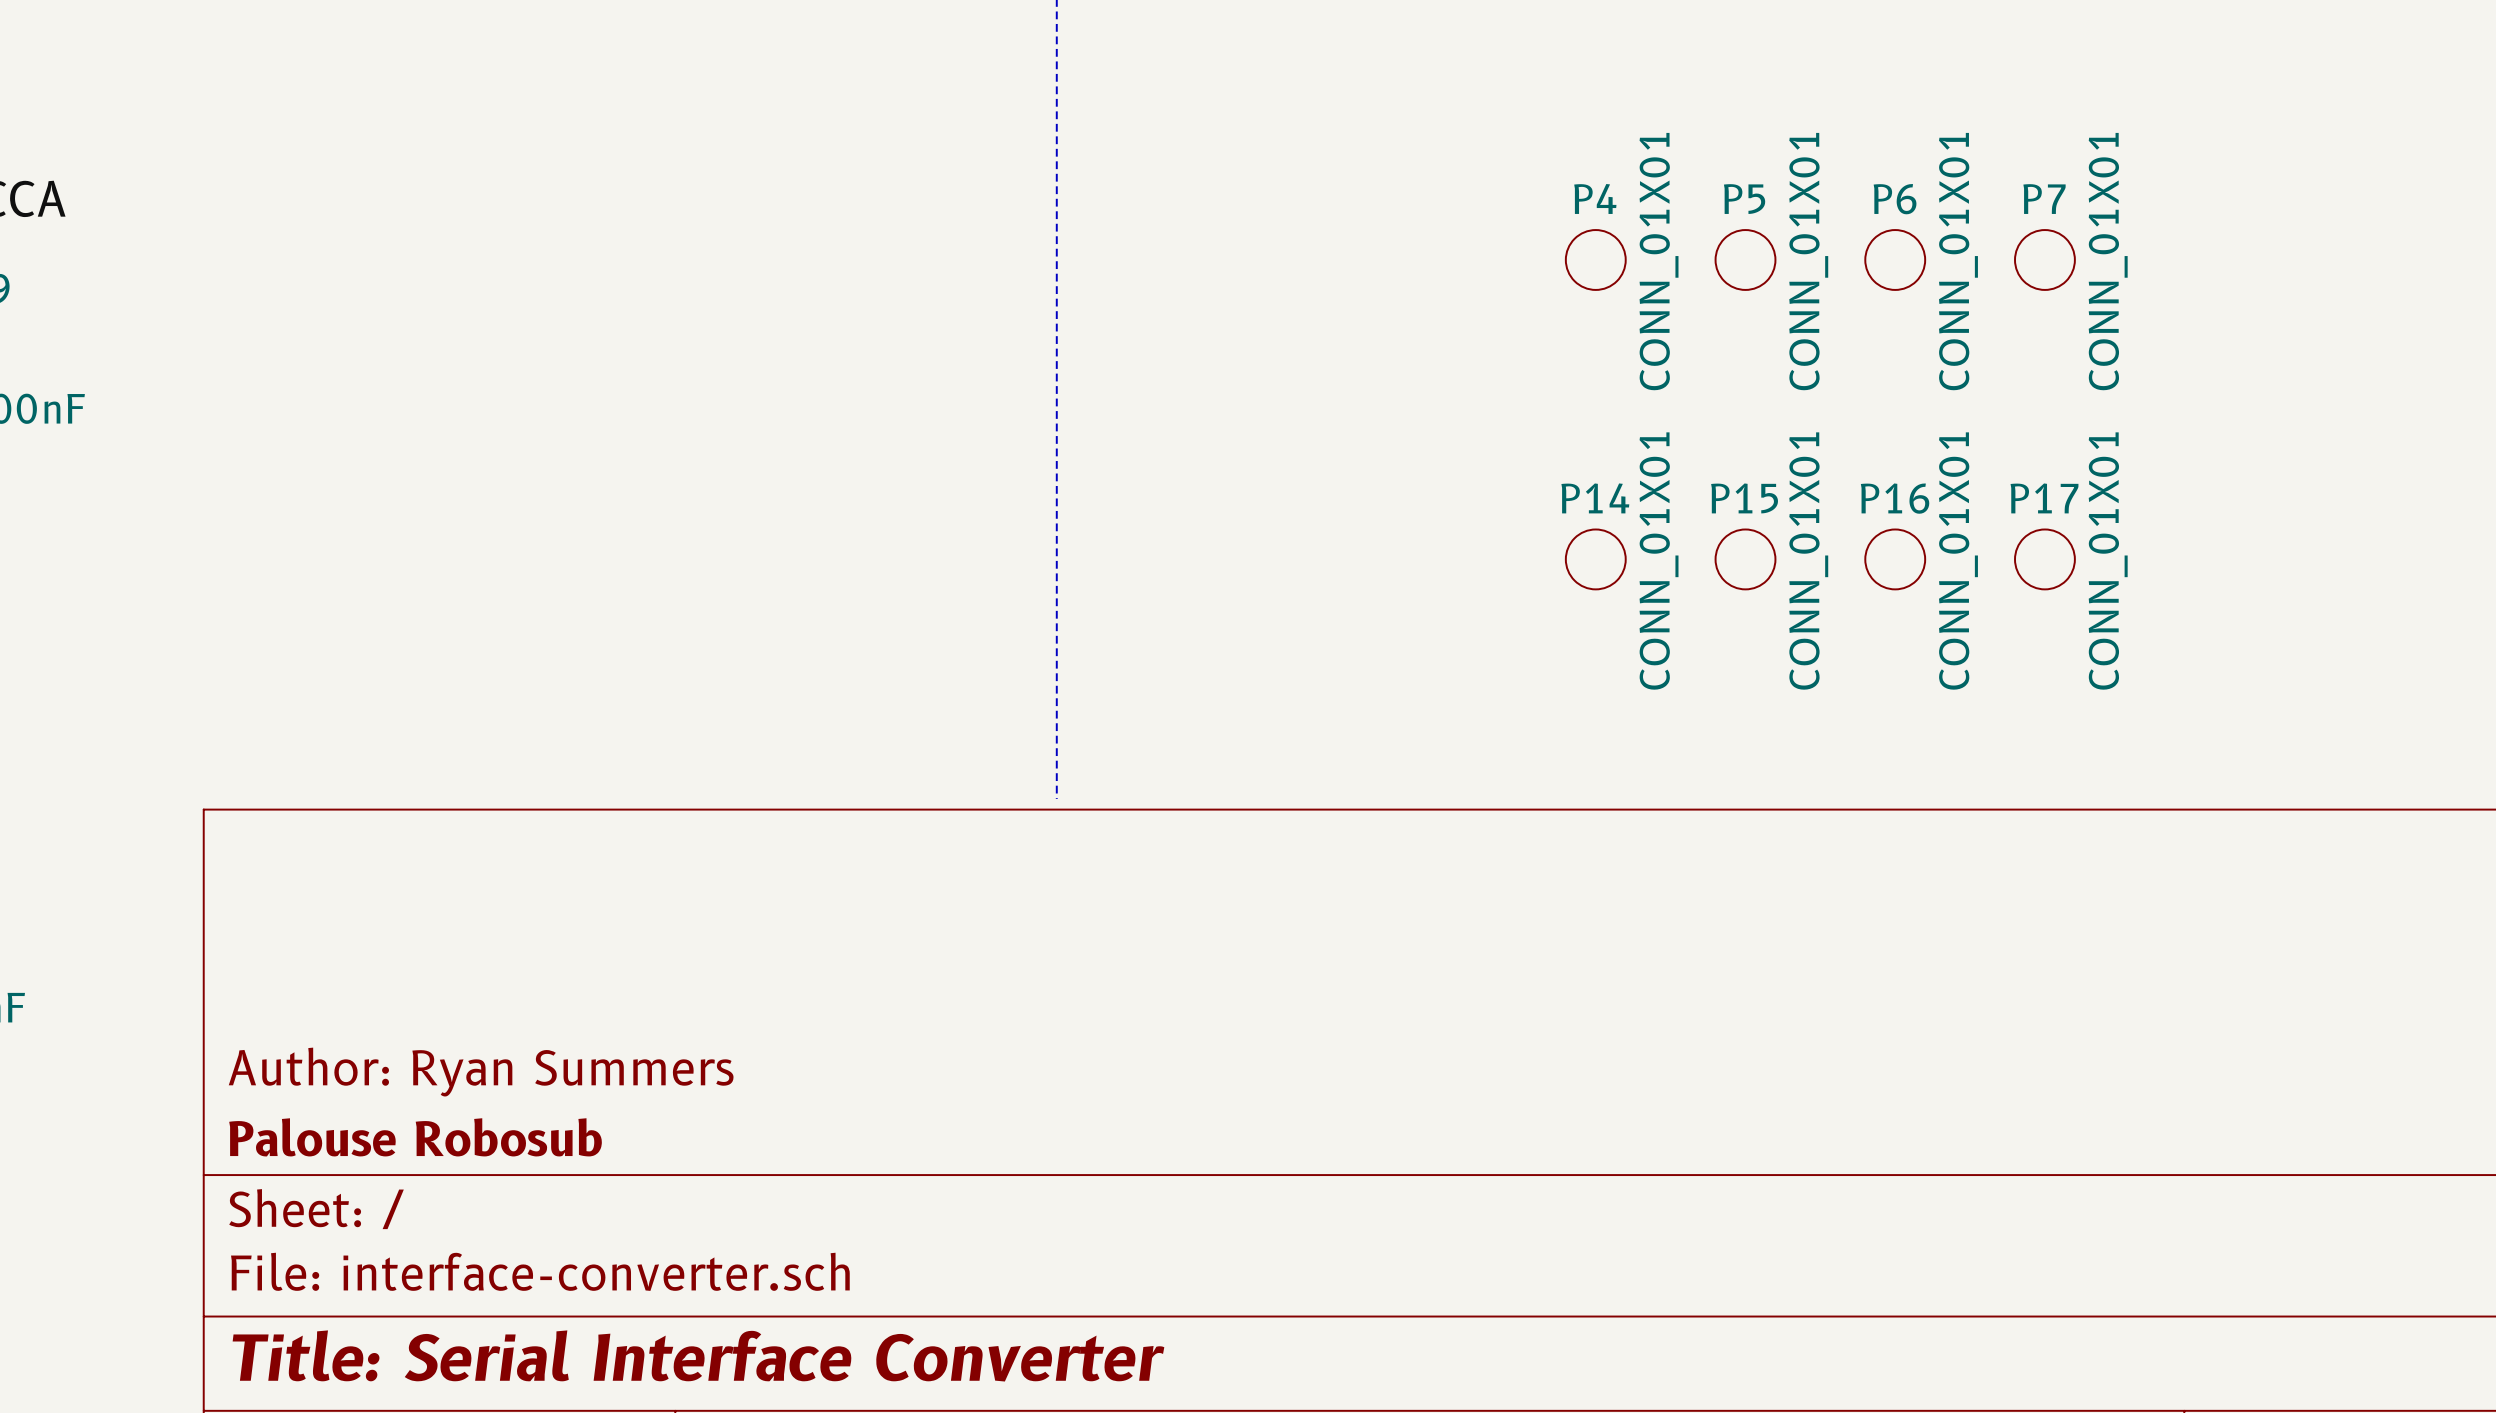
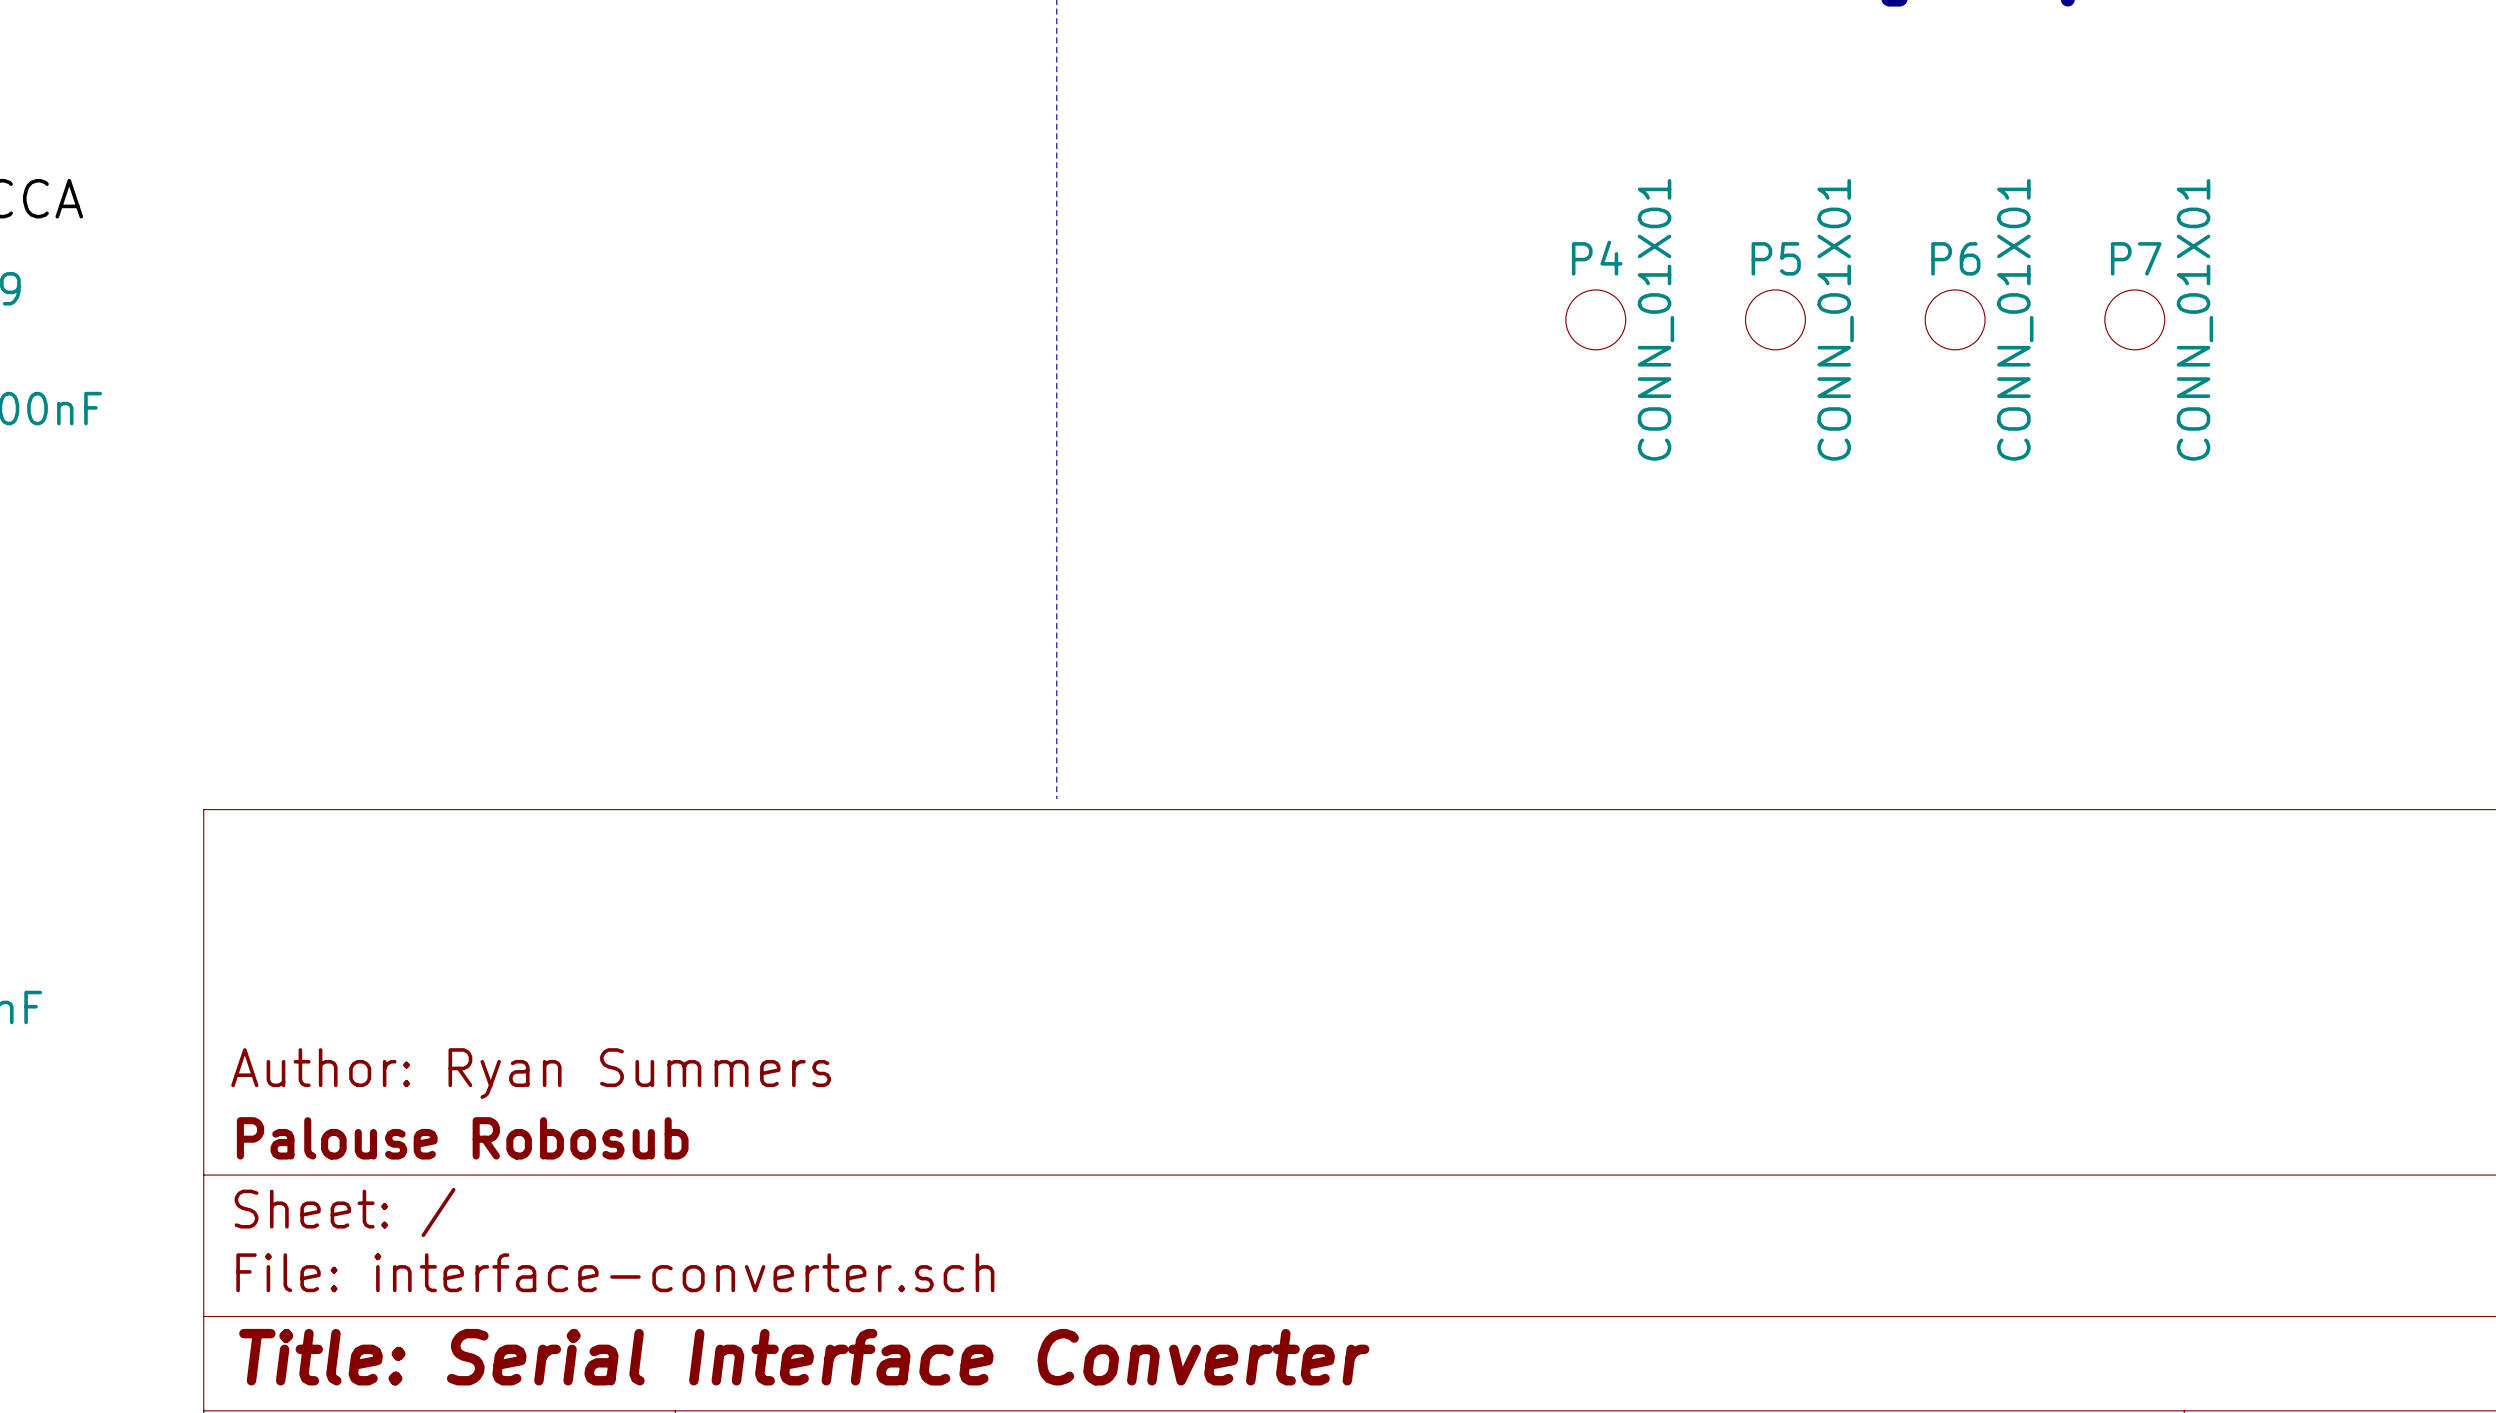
P4 position: (1595, 259) -> (1595, 319)
P5 position: (1745, 259) -> (1775, 319)
P6 position: (1895, 259) -> (1955, 319)
P7 position: (2044, 259) -> (2134, 319)
P14: CONN_01X01 (1595, 559) -> none
P15: CONN_01X01 (1745, 559) -> none
P16: CONN_01X01 (1895, 559) -> none
P17: CONN_01X01 (2044, 559) -> none

